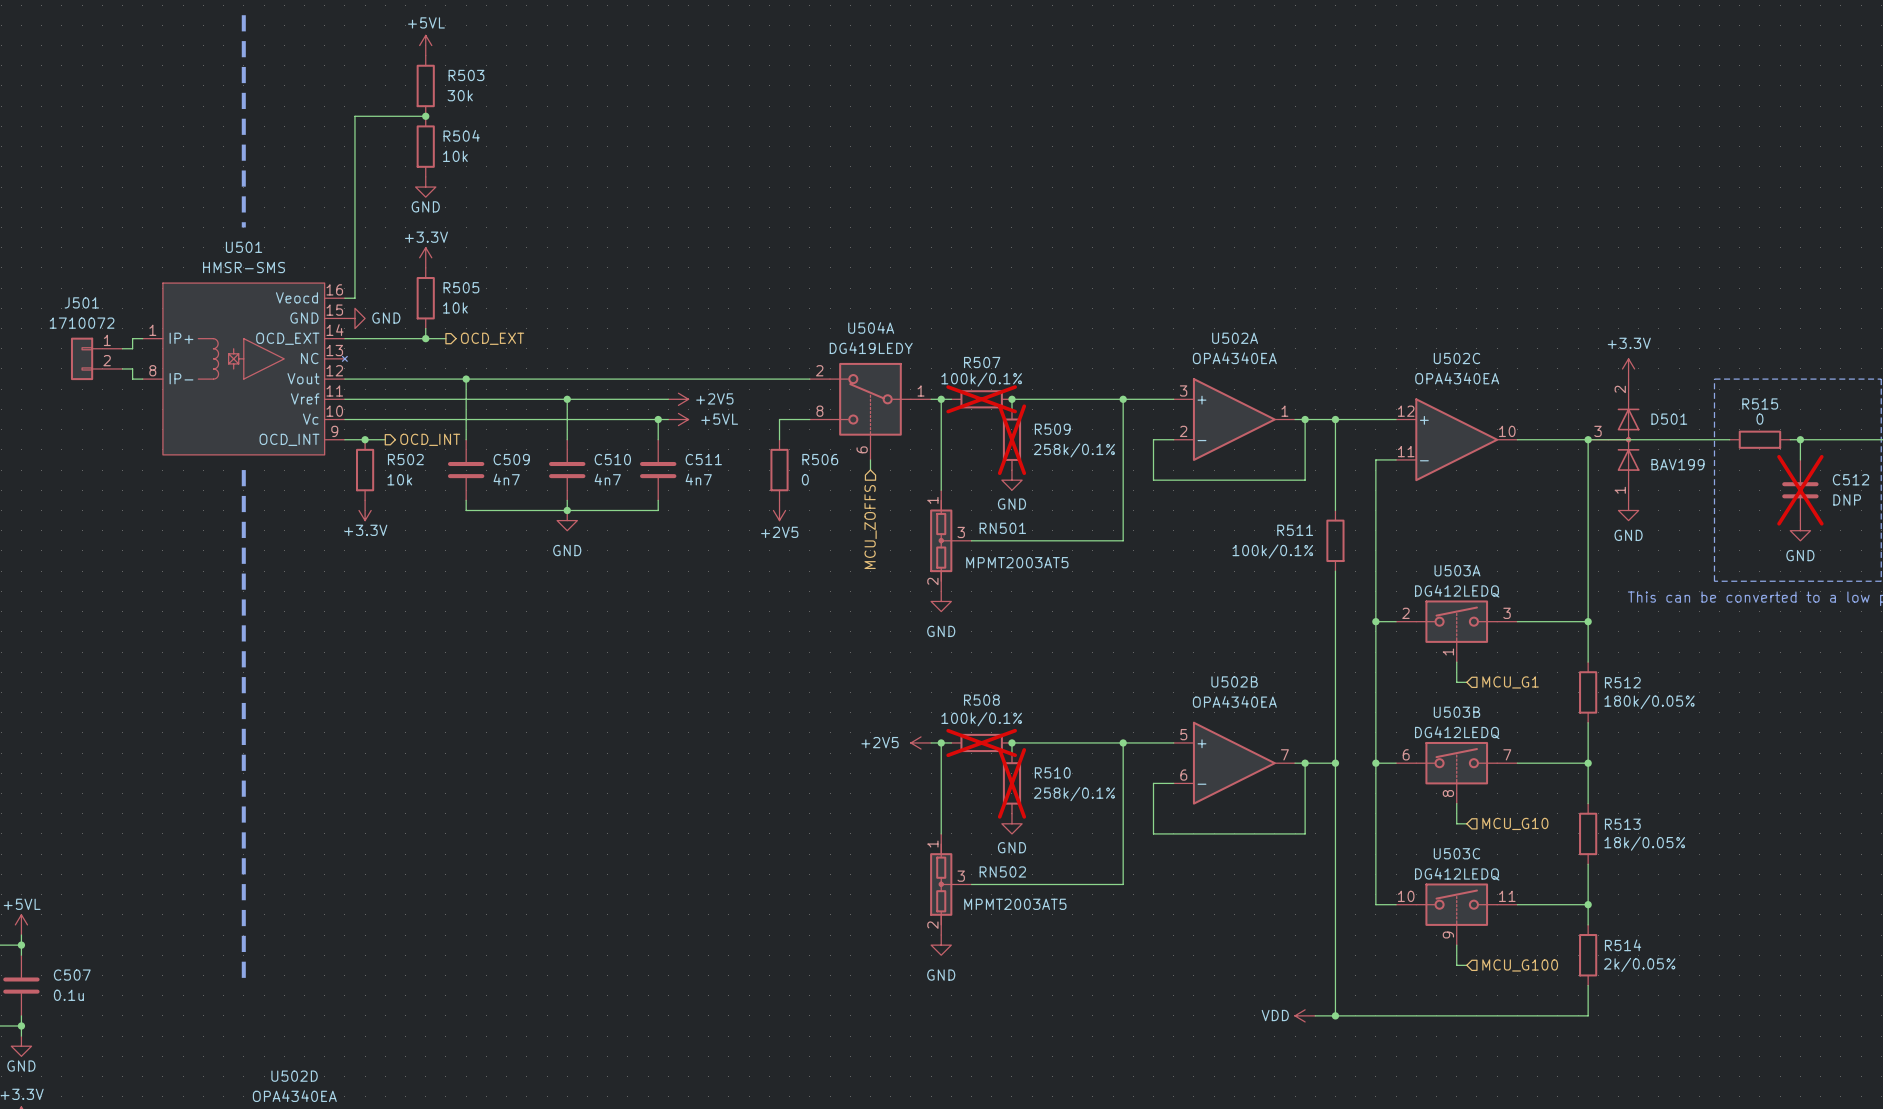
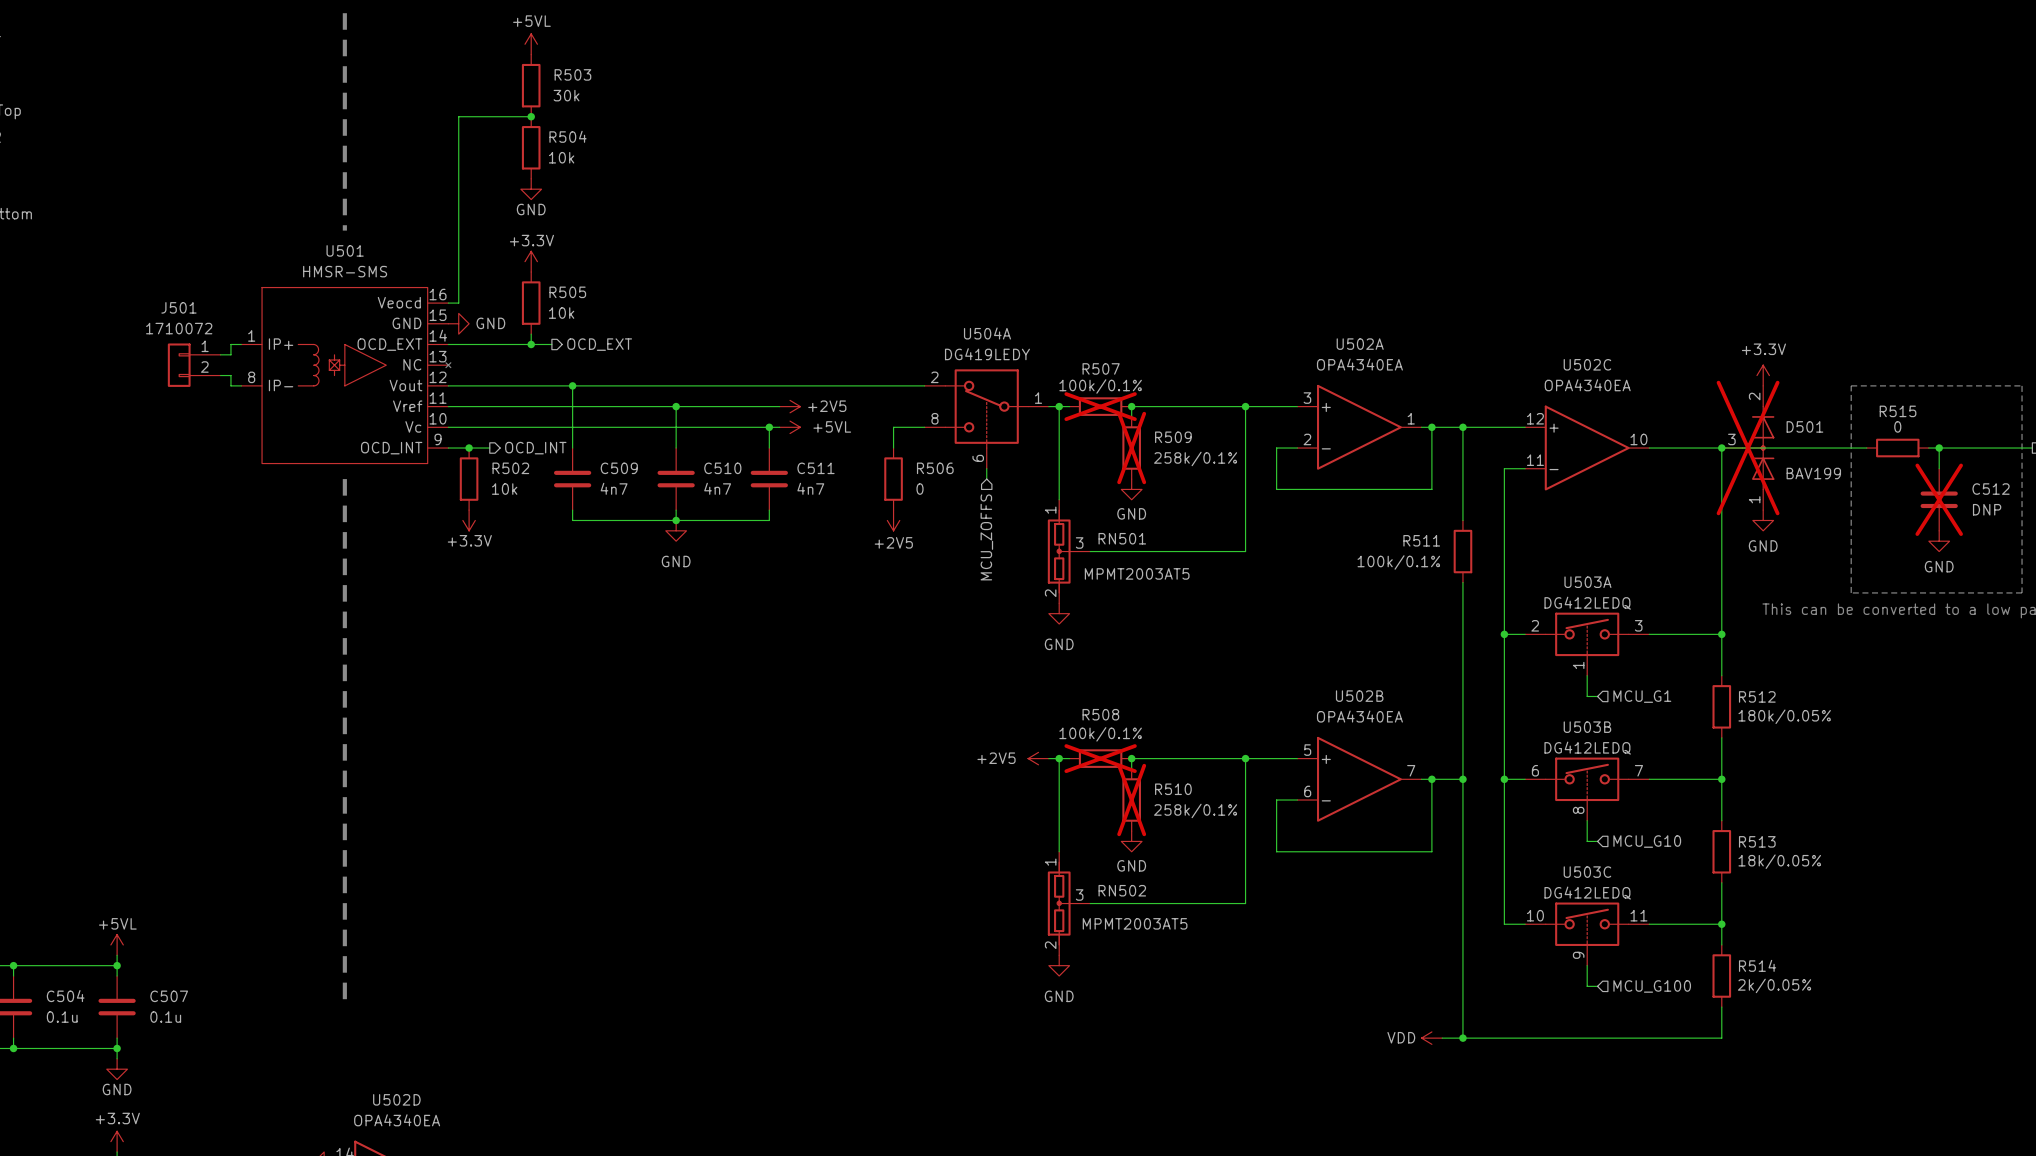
D501 do-not-place cross: none -> (1748, 448)

